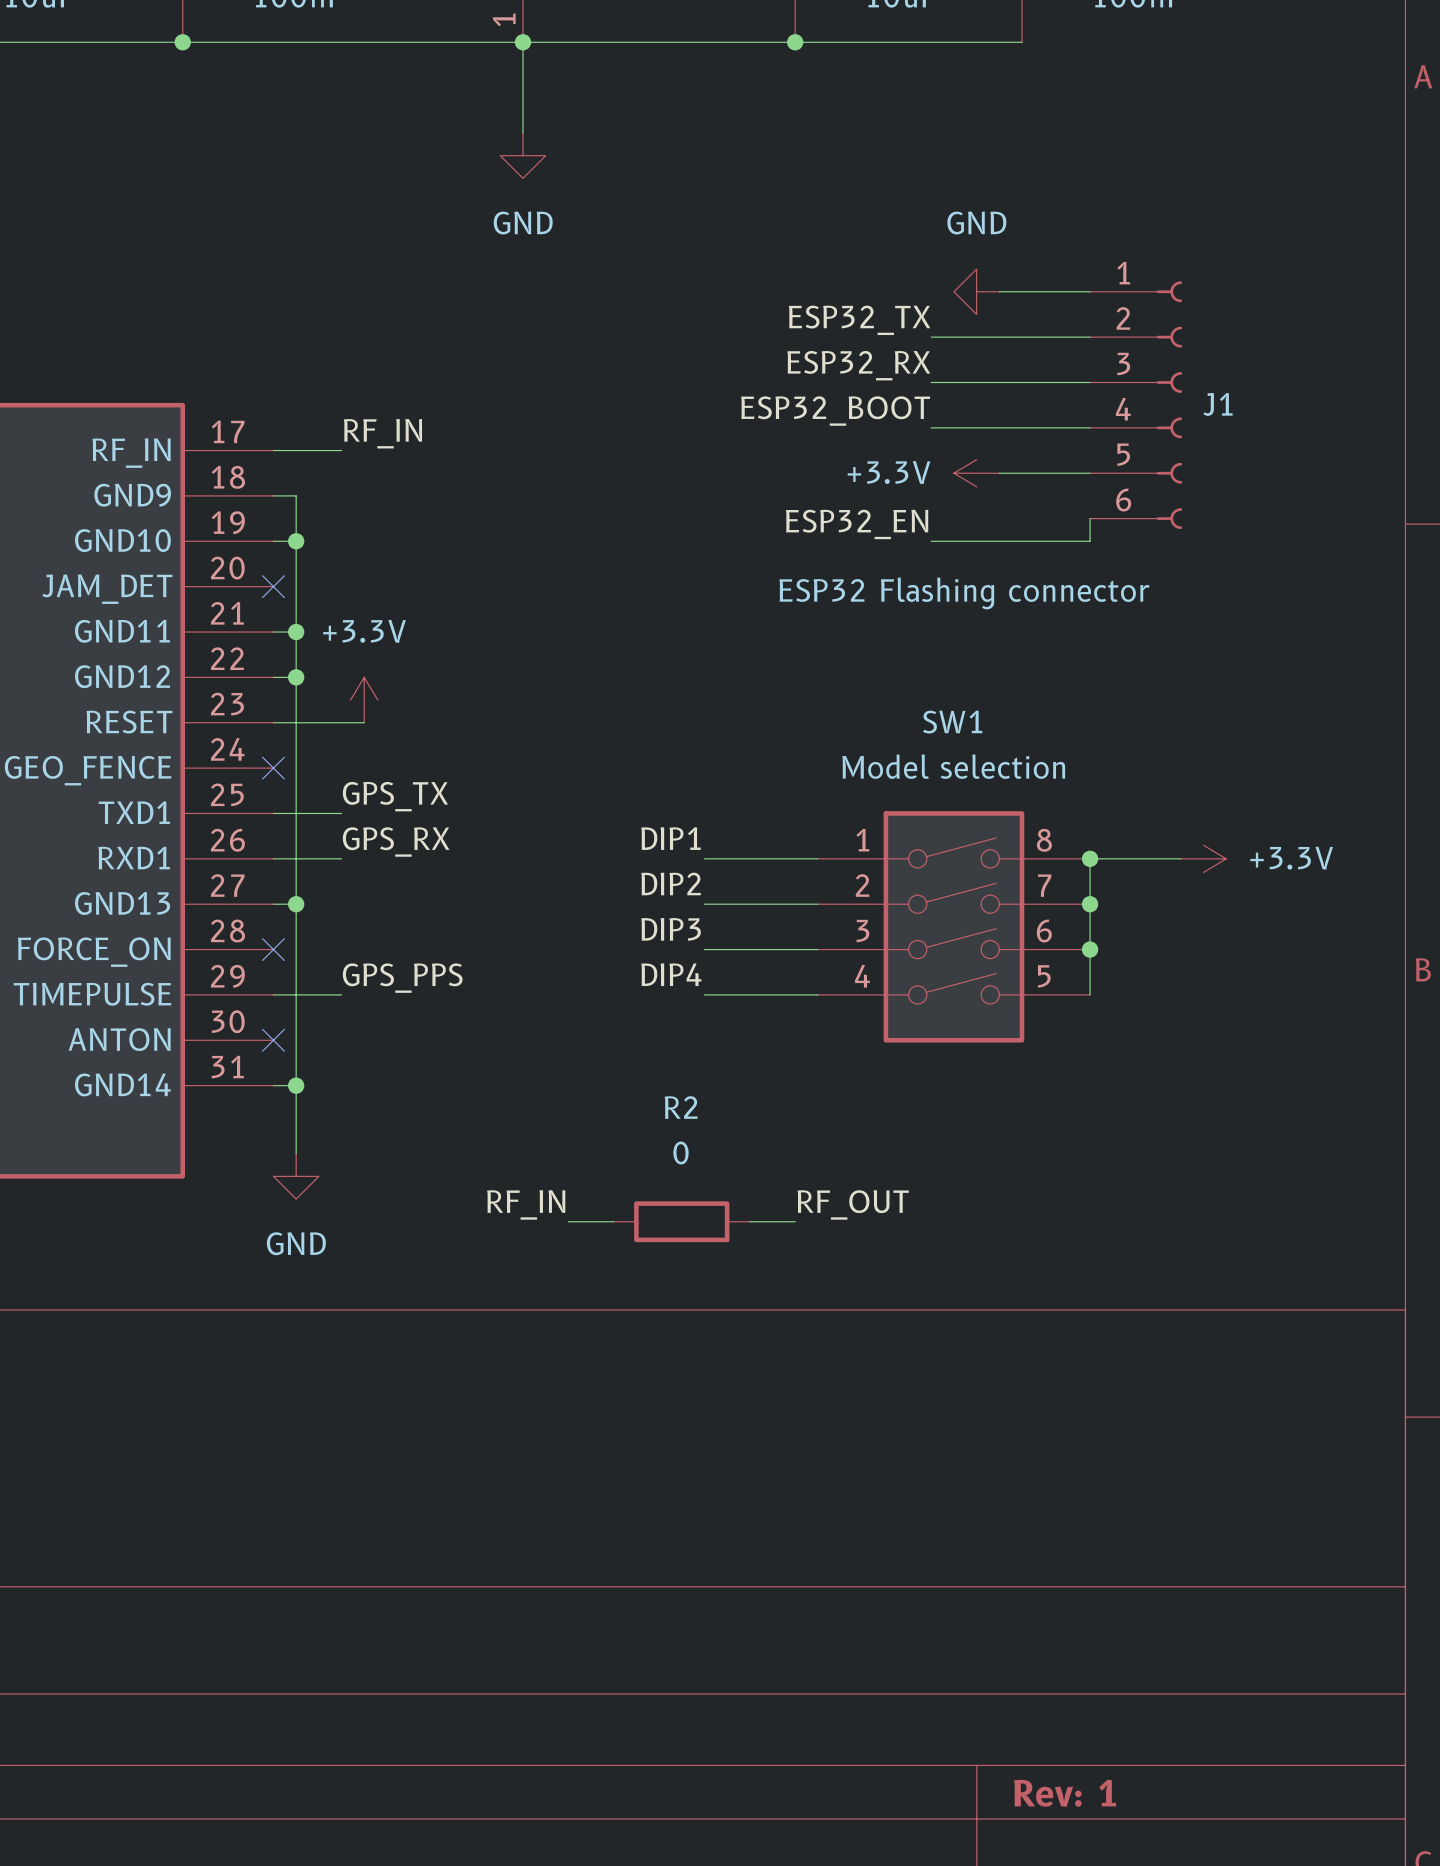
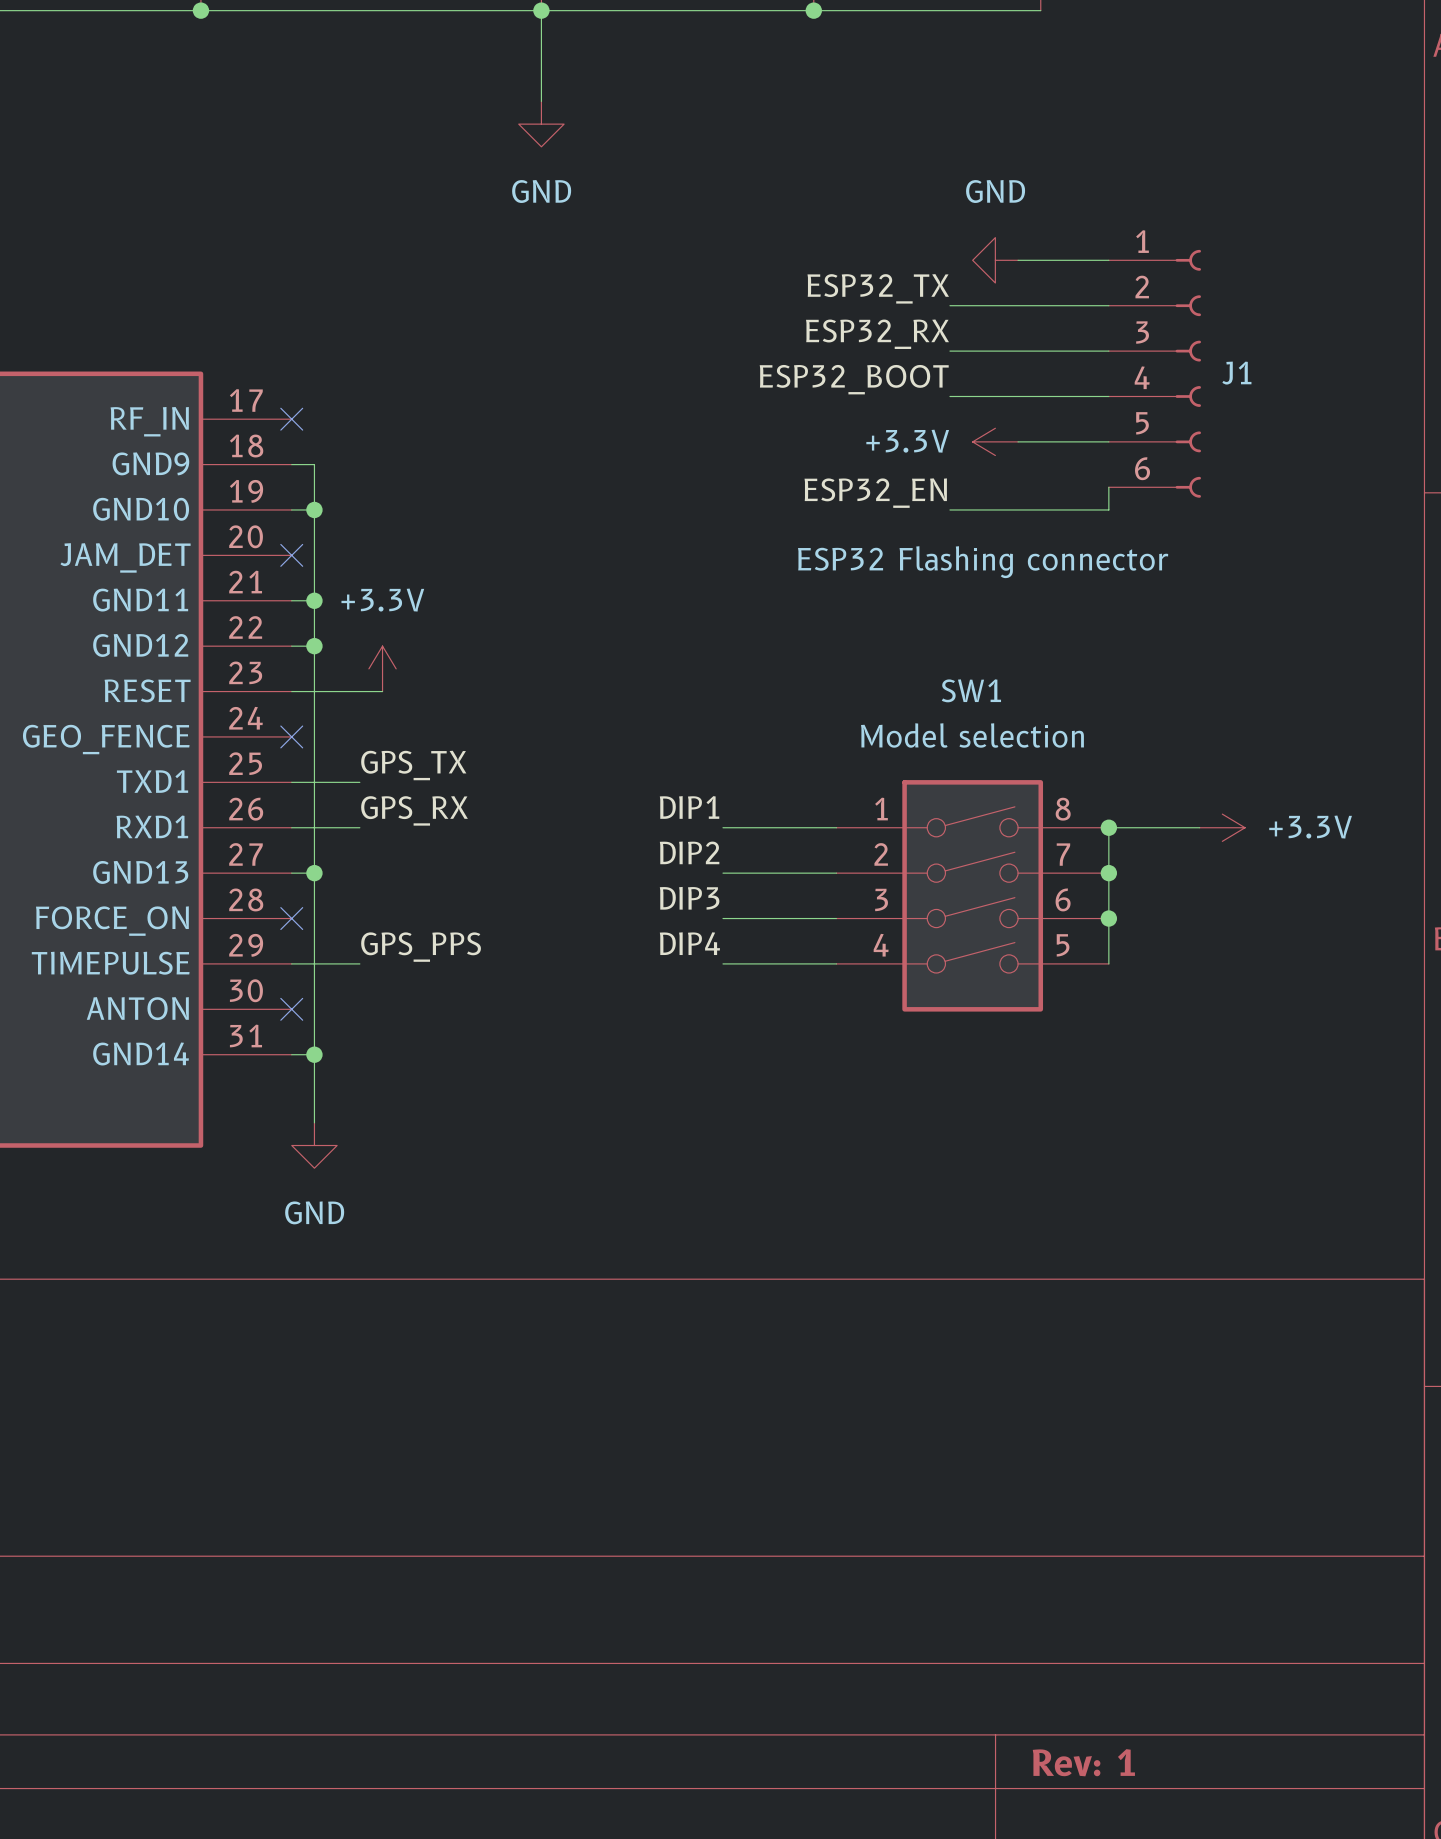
label: RF_IN (382, 433) -> none
wire: (273, 450) (341, 450) -> none
no-connect mark: none -> (291, 419)
label: RF_IN (526, 1204) -> none
label: RF_OUT (853, 1204) -> none
wire: (568, 1221) (613, 1221) -> none
R2: 0 (681, 1221) -> none
wire: (749, 1221) (795, 1221) -> none

